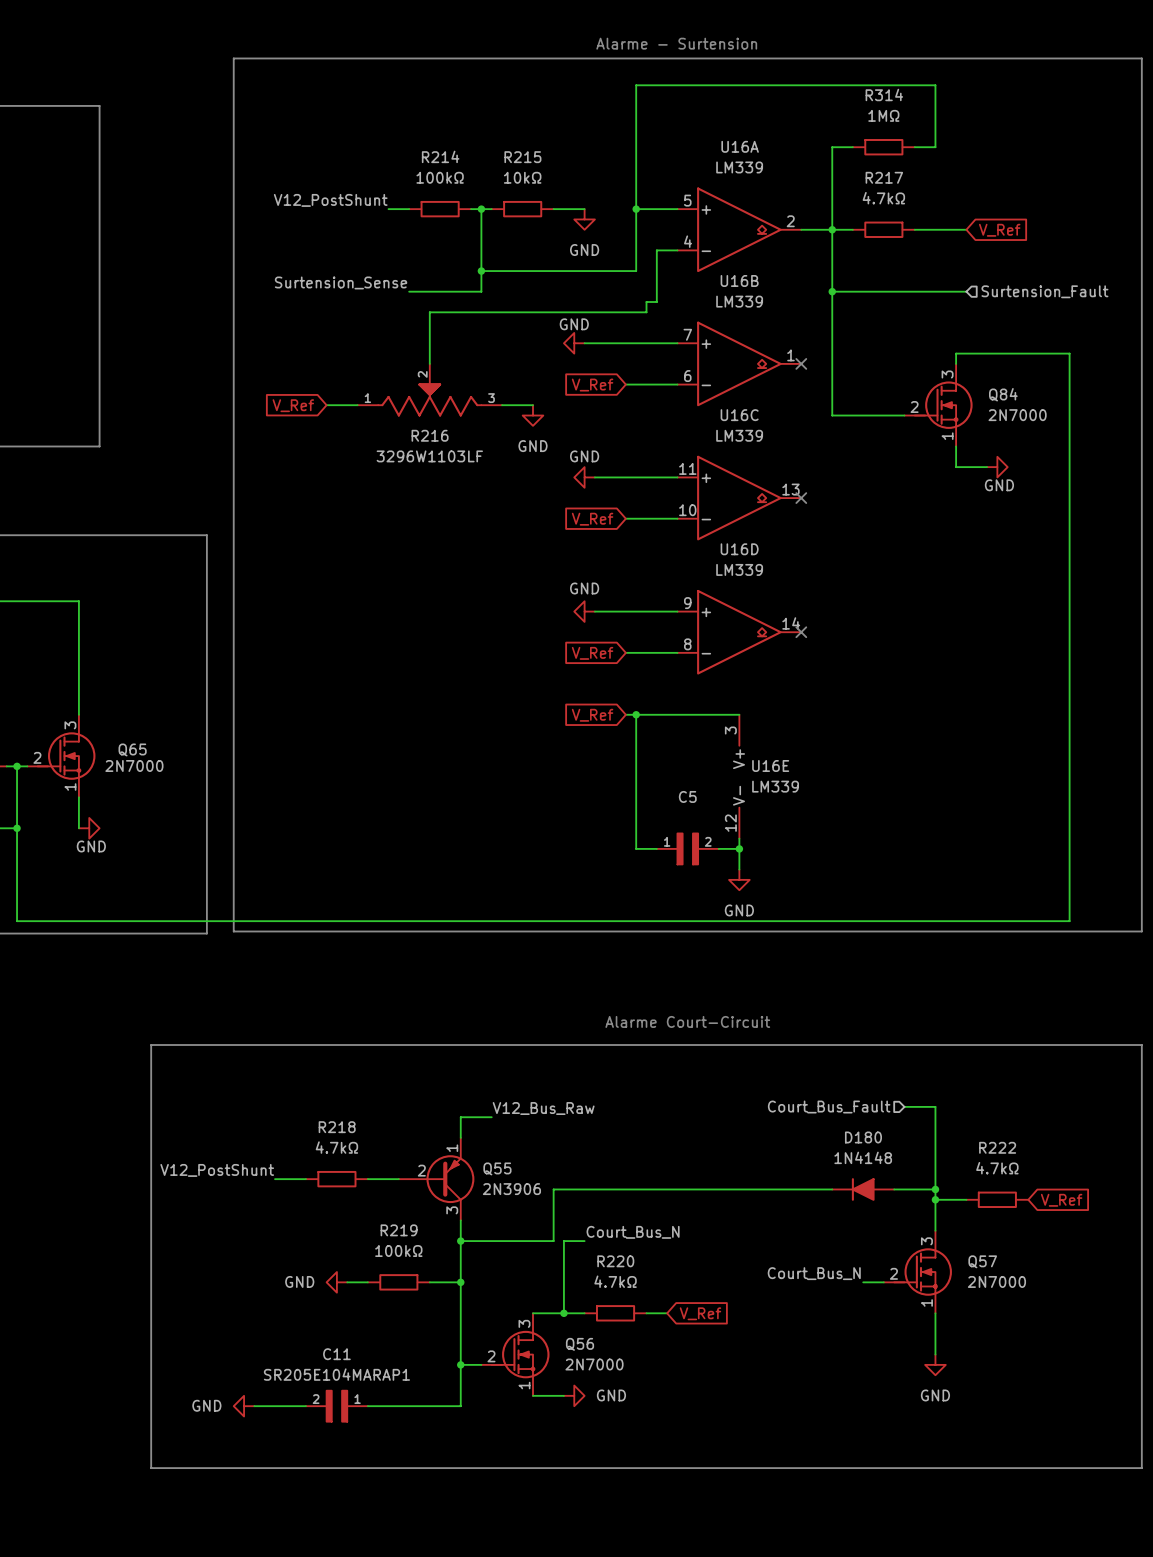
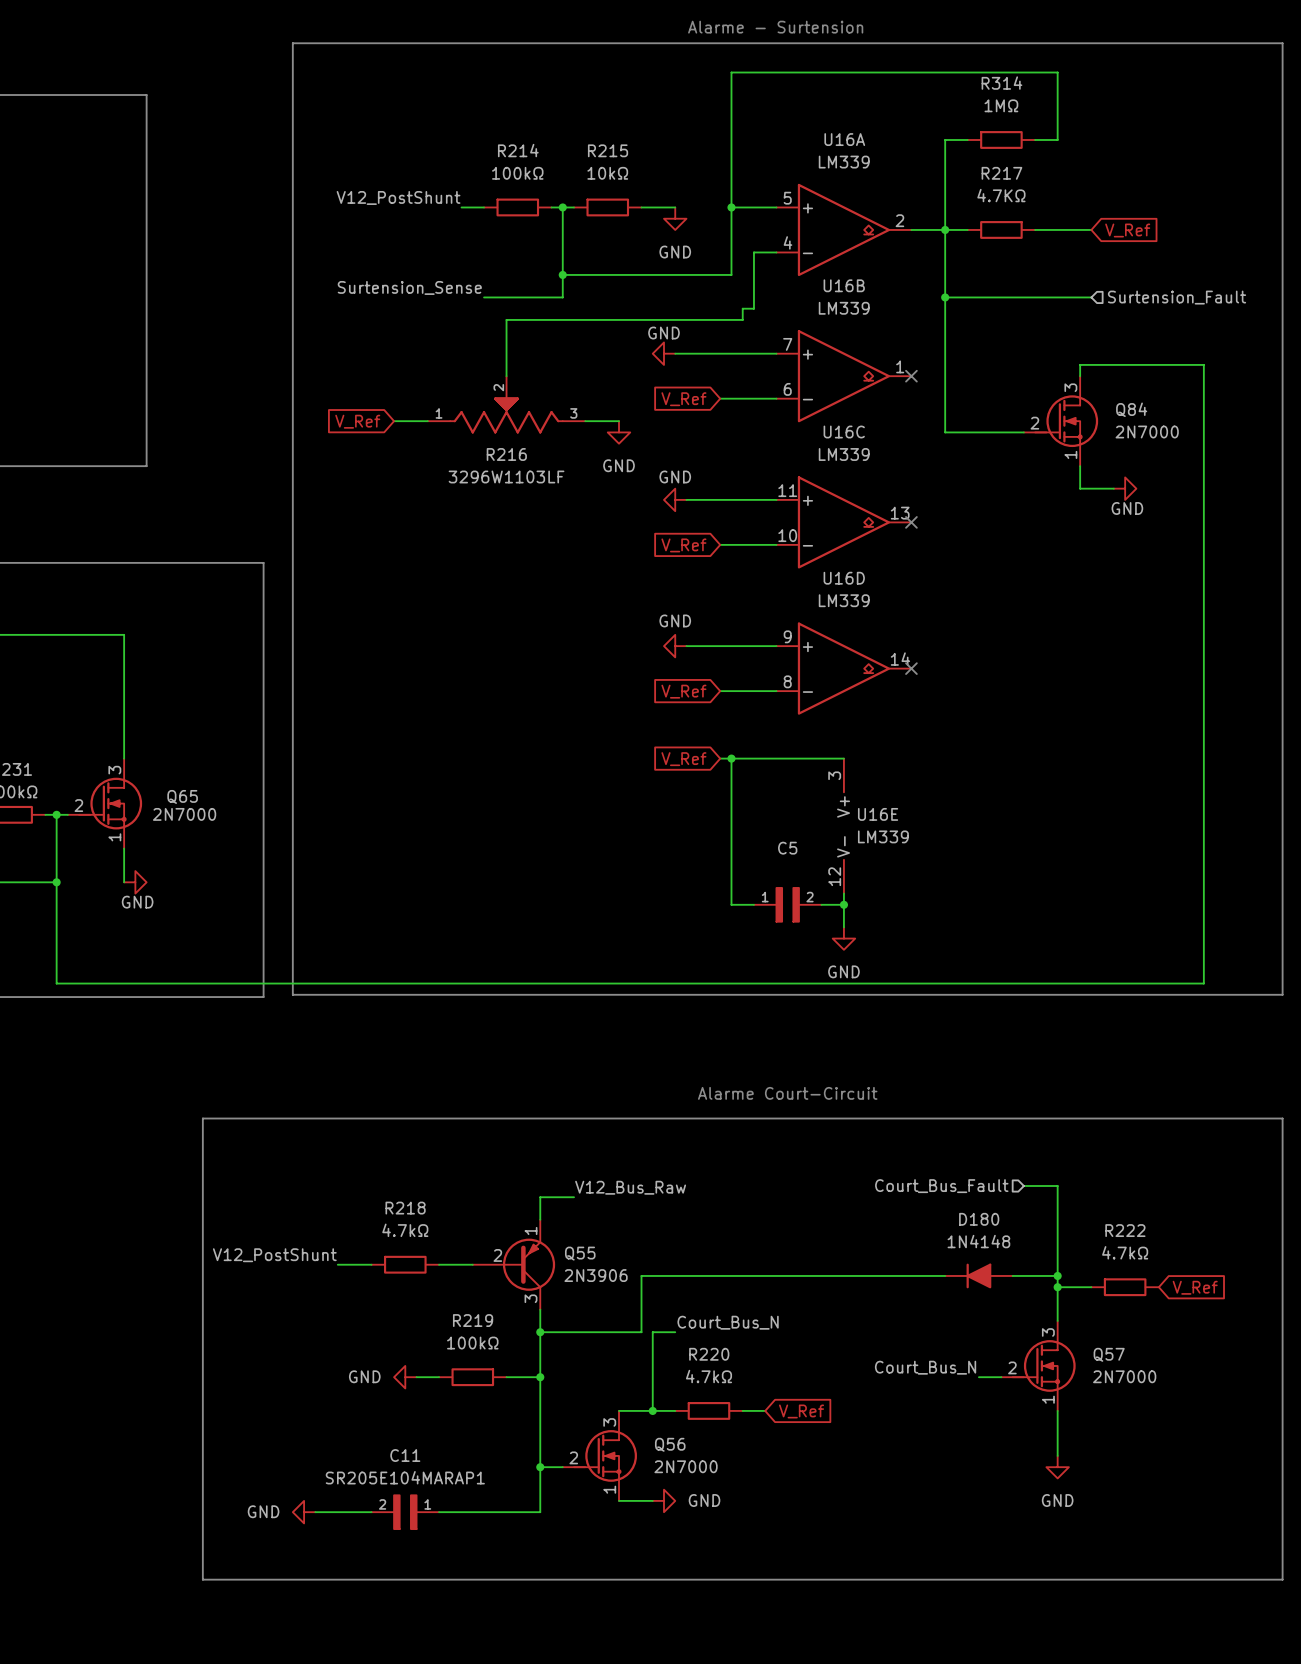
R217 value: 4.7kΩ (883, 198) -> 4.7KΩ (1001, 195)

